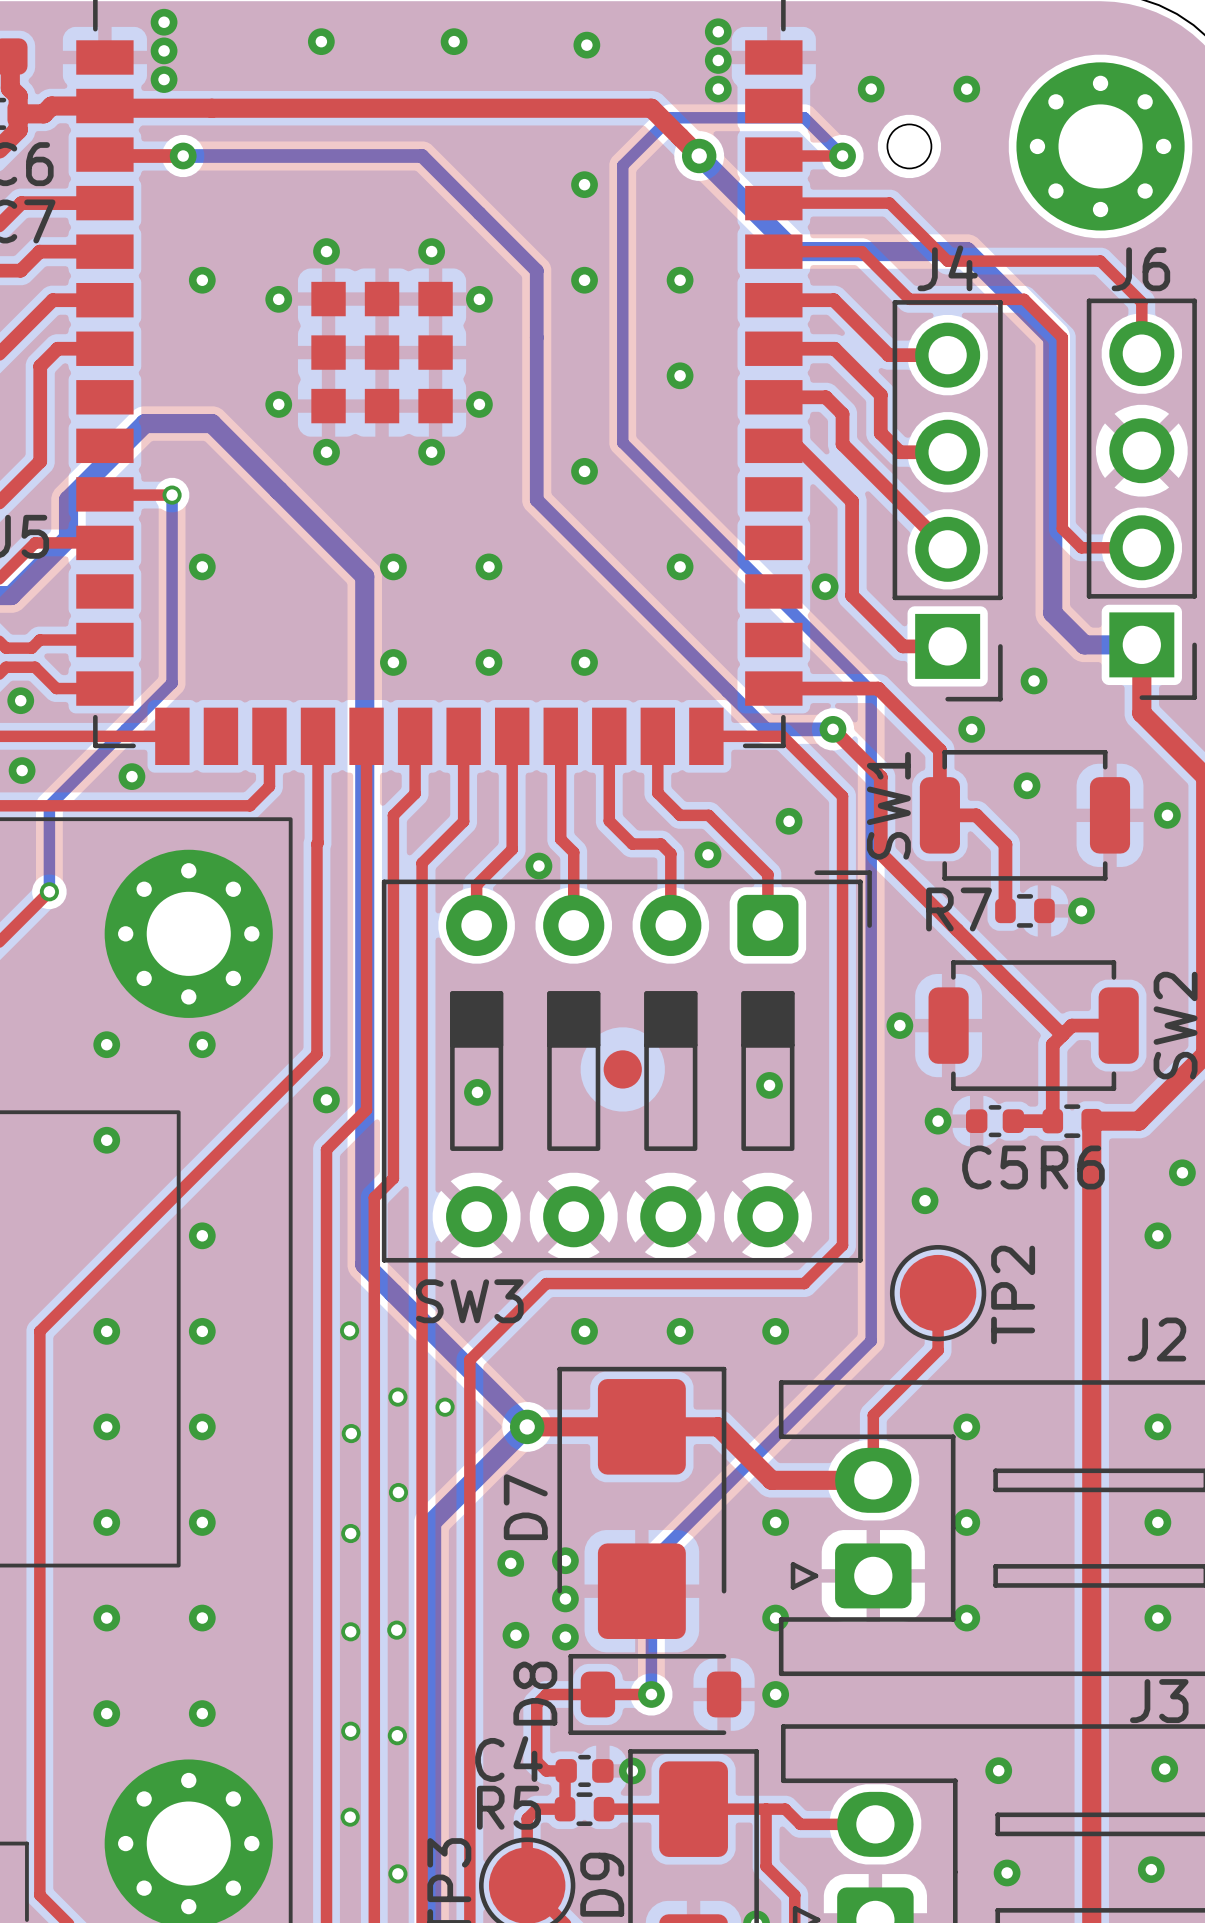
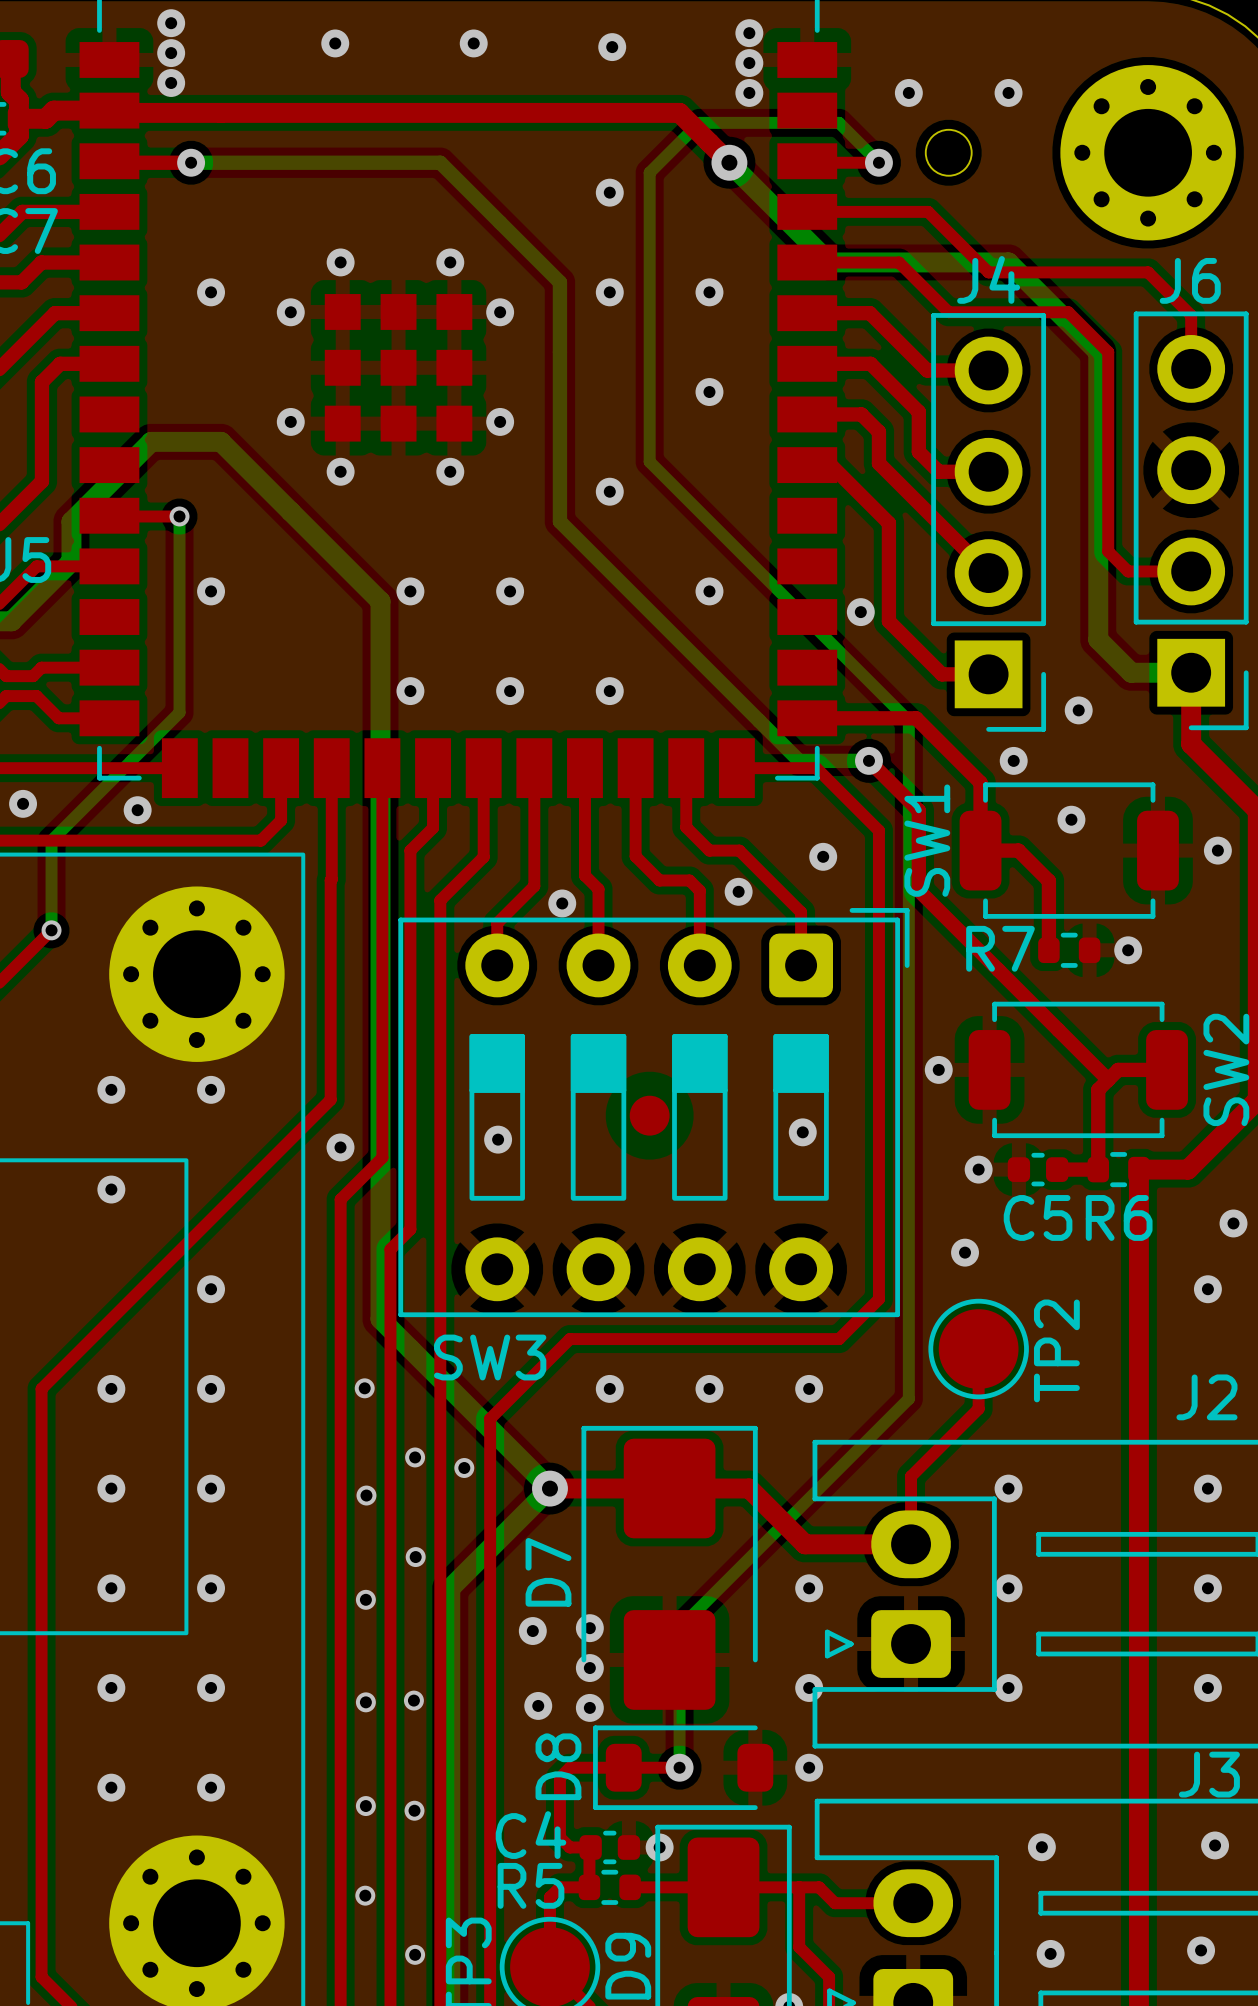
via: (20, 700) -> none

